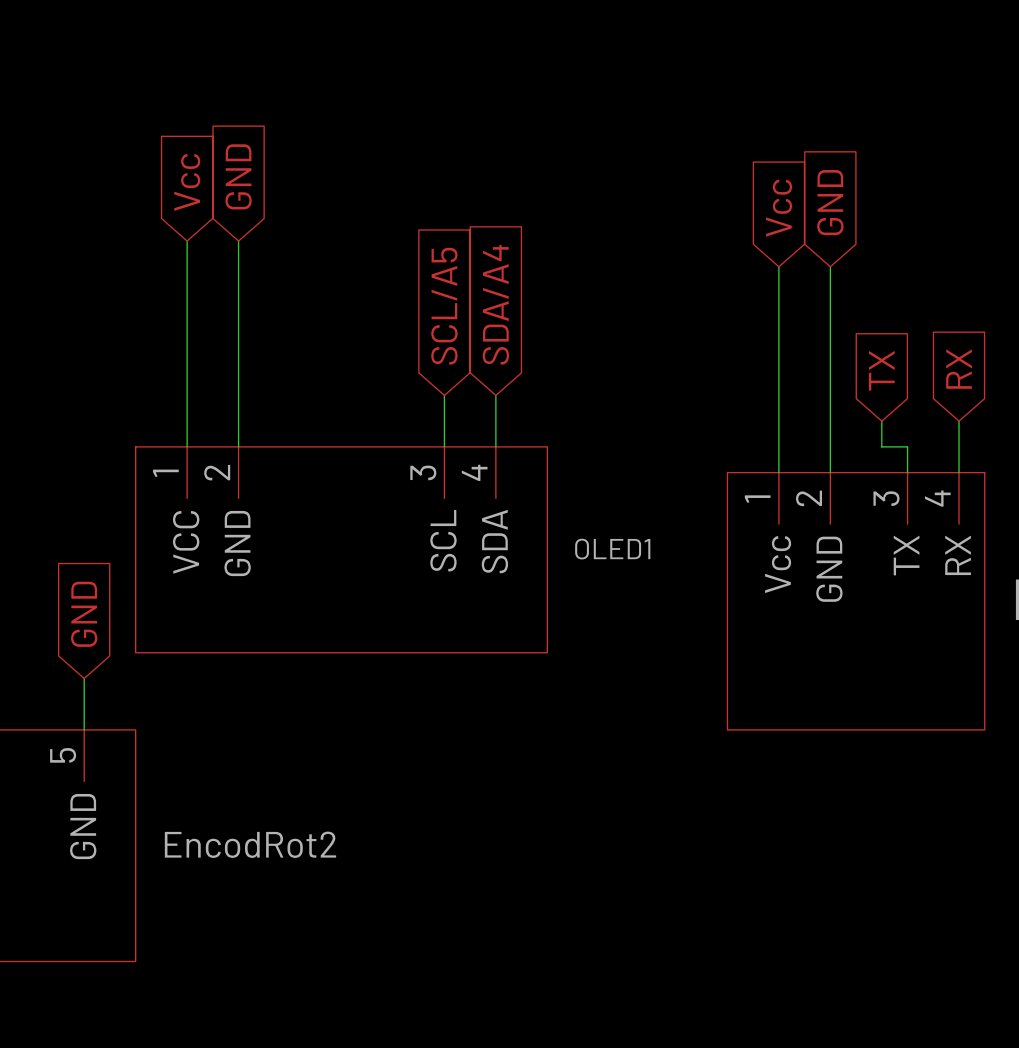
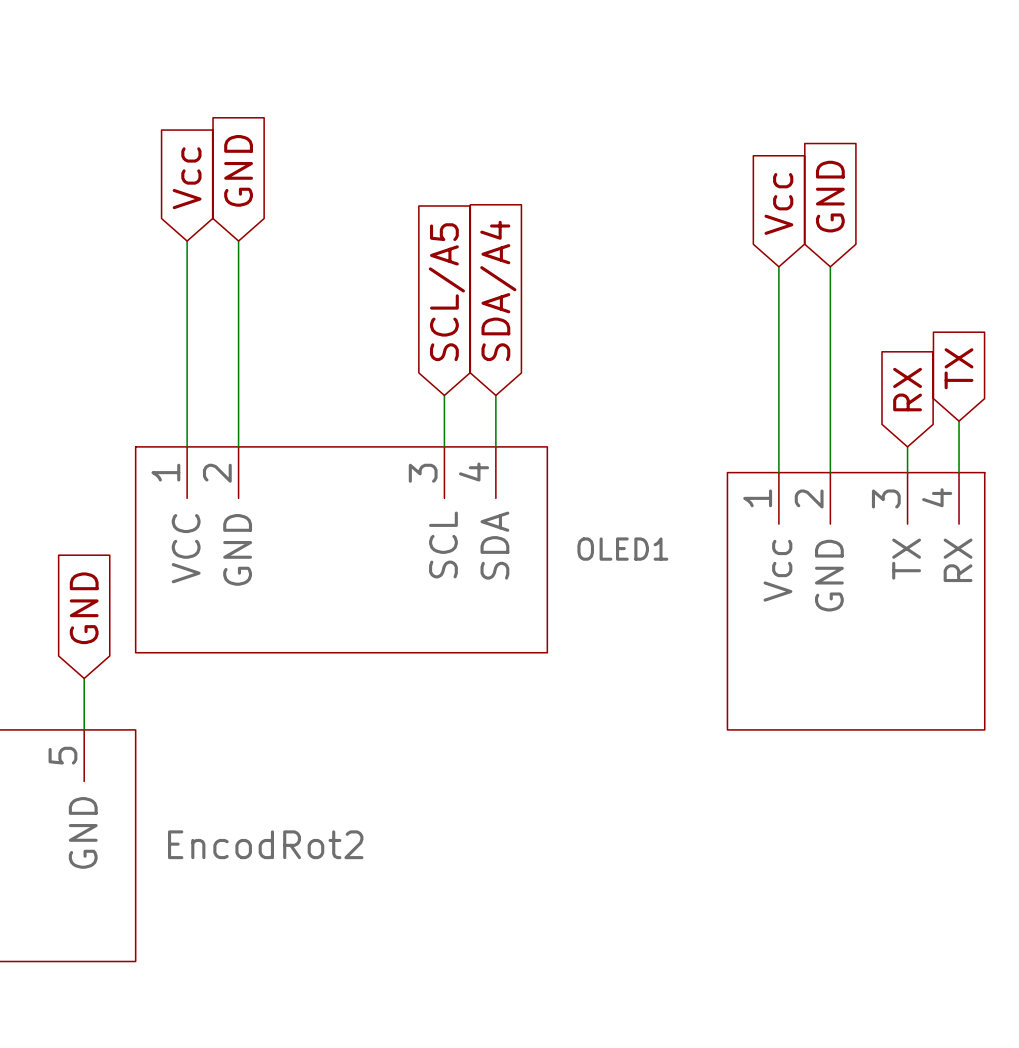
global label: RX (959, 369) -> TX (959, 368)
global label: TX (881, 370) -> none
global label: none -> RX (907, 389)
wire: (881, 421) (881, 446) (907, 446) -> none

